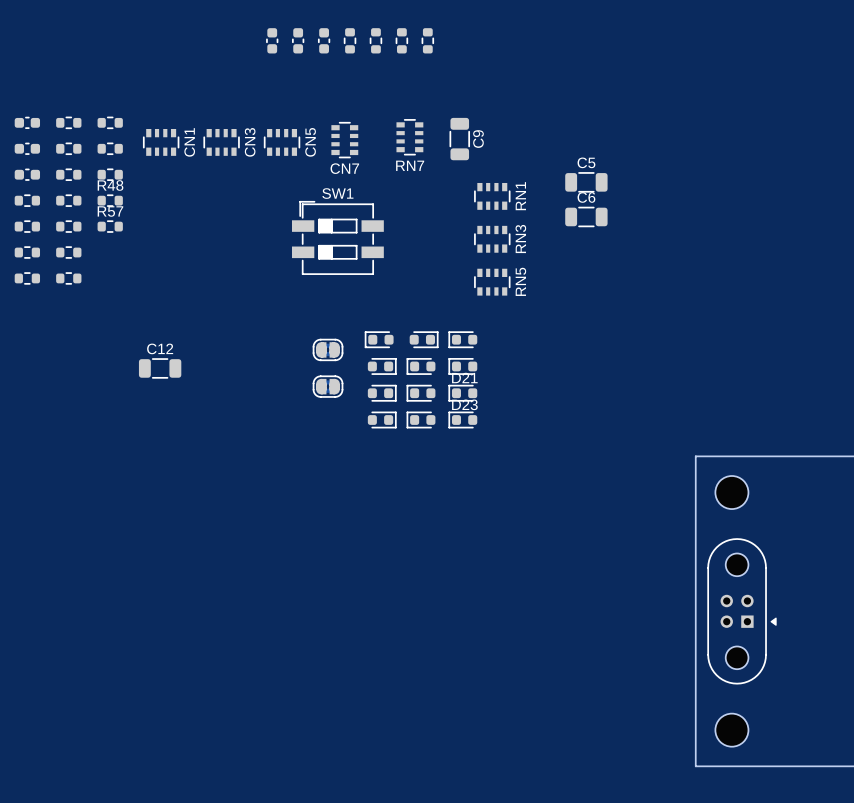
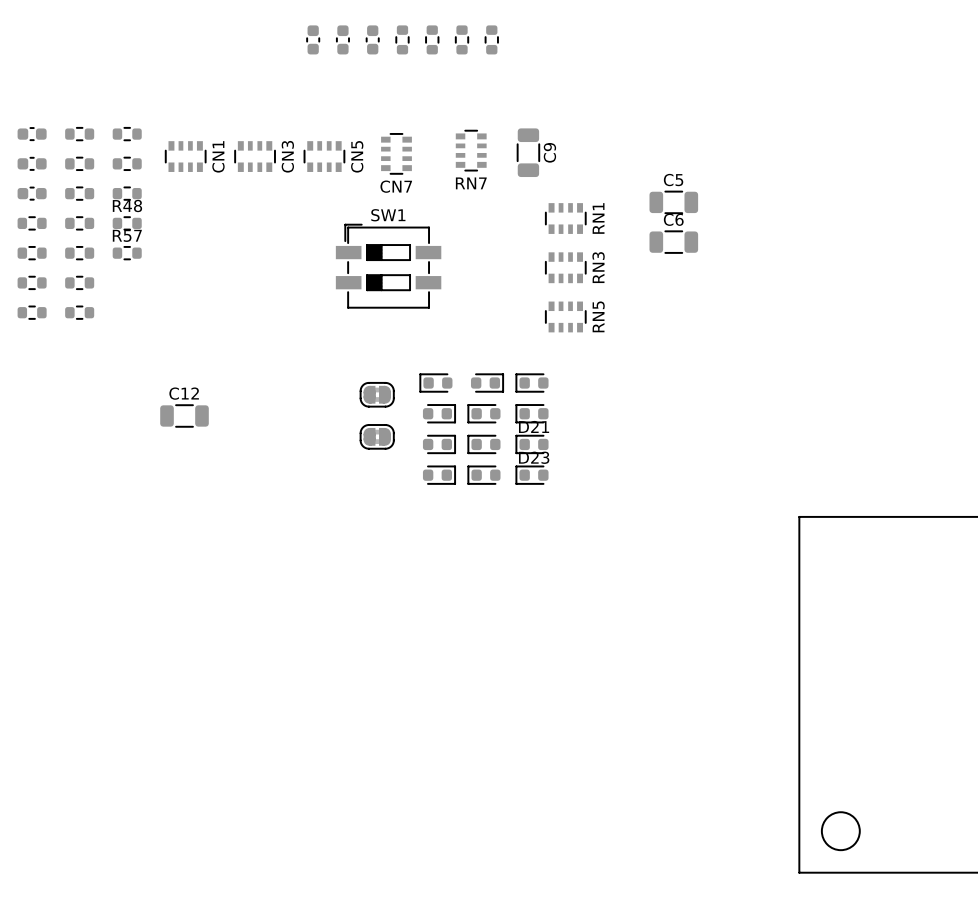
part: (731, 492) -> none
part: (742, 611) -> none

